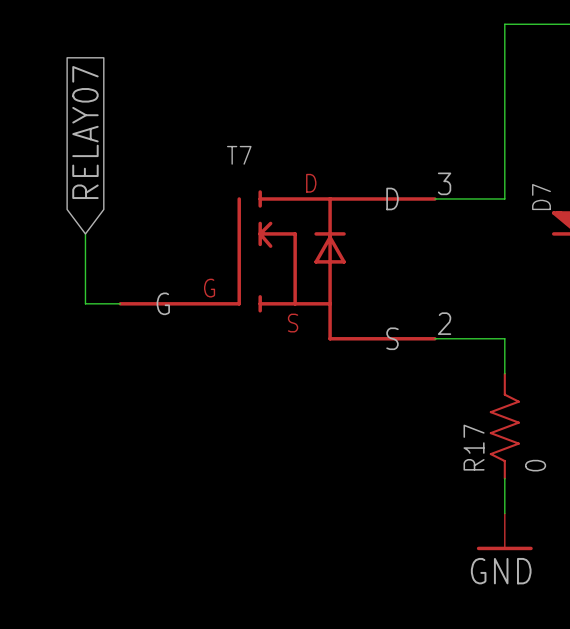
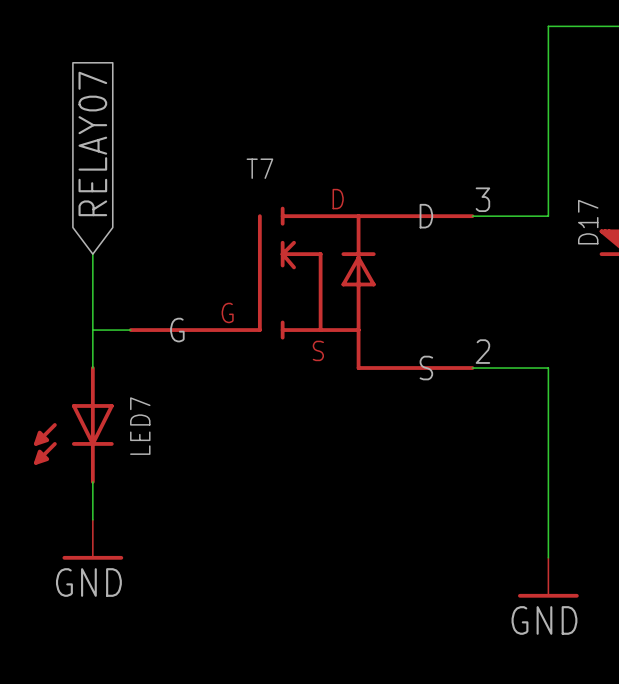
D7 name: D7 (541, 197) -> D17 (588, 222)
wire: none -> (92, 330) (92, 368)
wire: none -> (548, 405) (548, 519)
LED7: none -> (73, 424)
R17: 0 (504, 426) -> none
wire: none -> (92, 481) (92, 519)
power symbol: none -> GND (92, 539)

